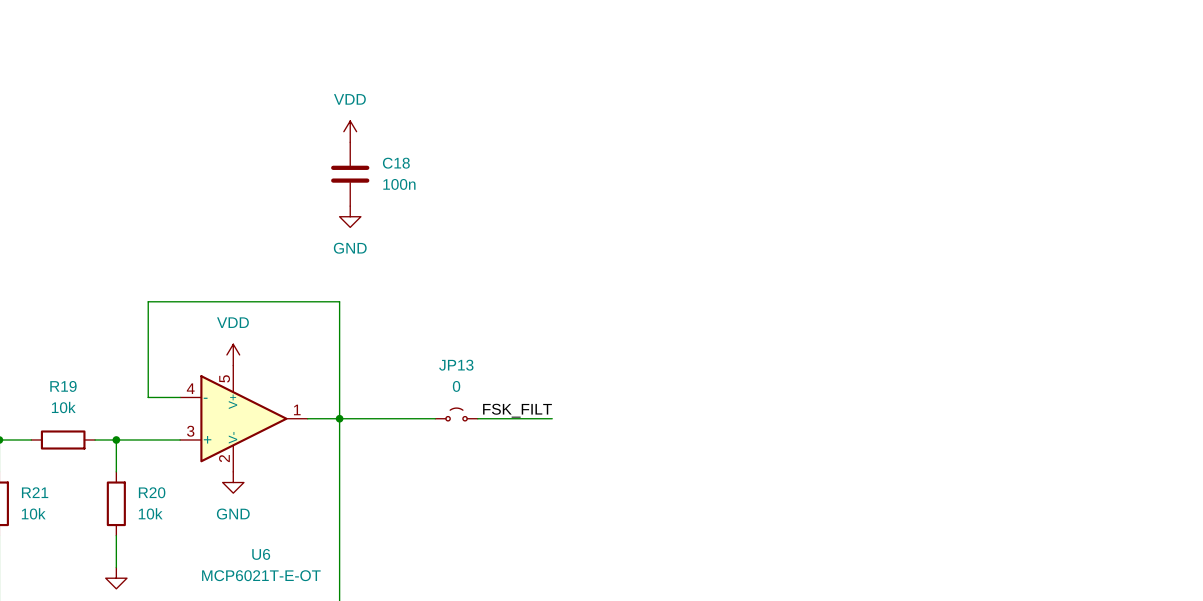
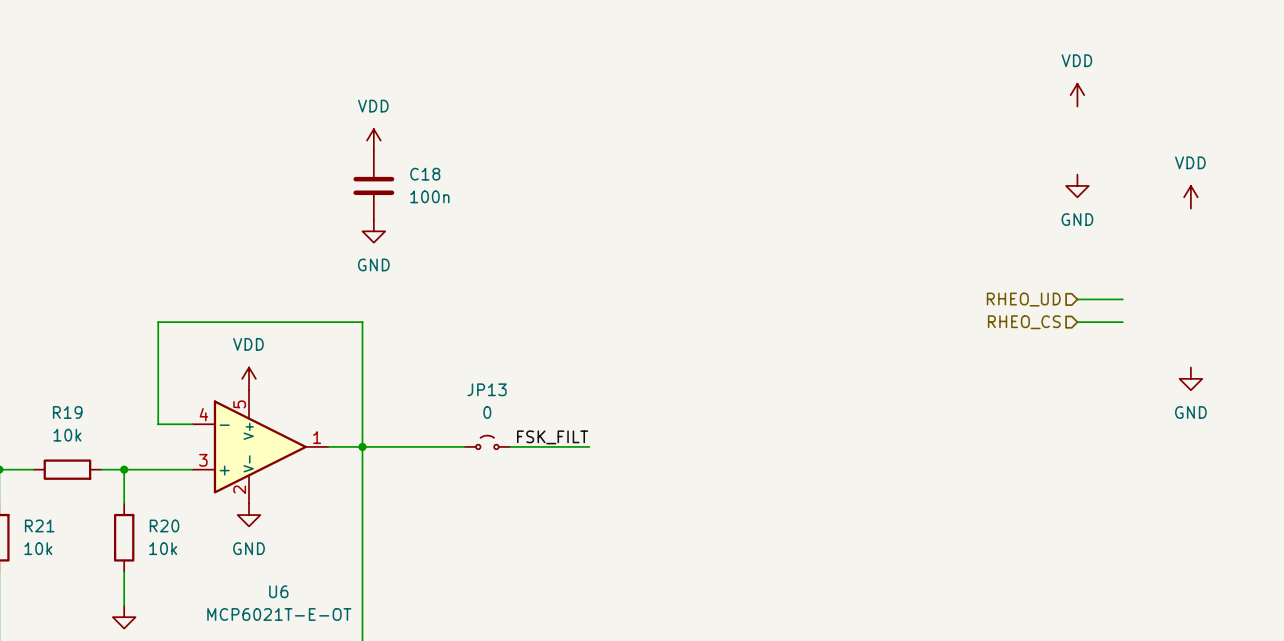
power symbol: none -> VDD (1077, 95)
power symbol: none -> GND (1077, 185)
power symbol: none -> VDD (1190, 197)
wire: none -> (1077, 299) (1122, 299)
hierarchical label: none -> RHEO_UD (1023, 299)
wire: none -> (1077, 322) (1122, 322)
hierarchical label: none -> RHEO_CS (1024, 322)
power symbol: none -> GND (1190, 378)

